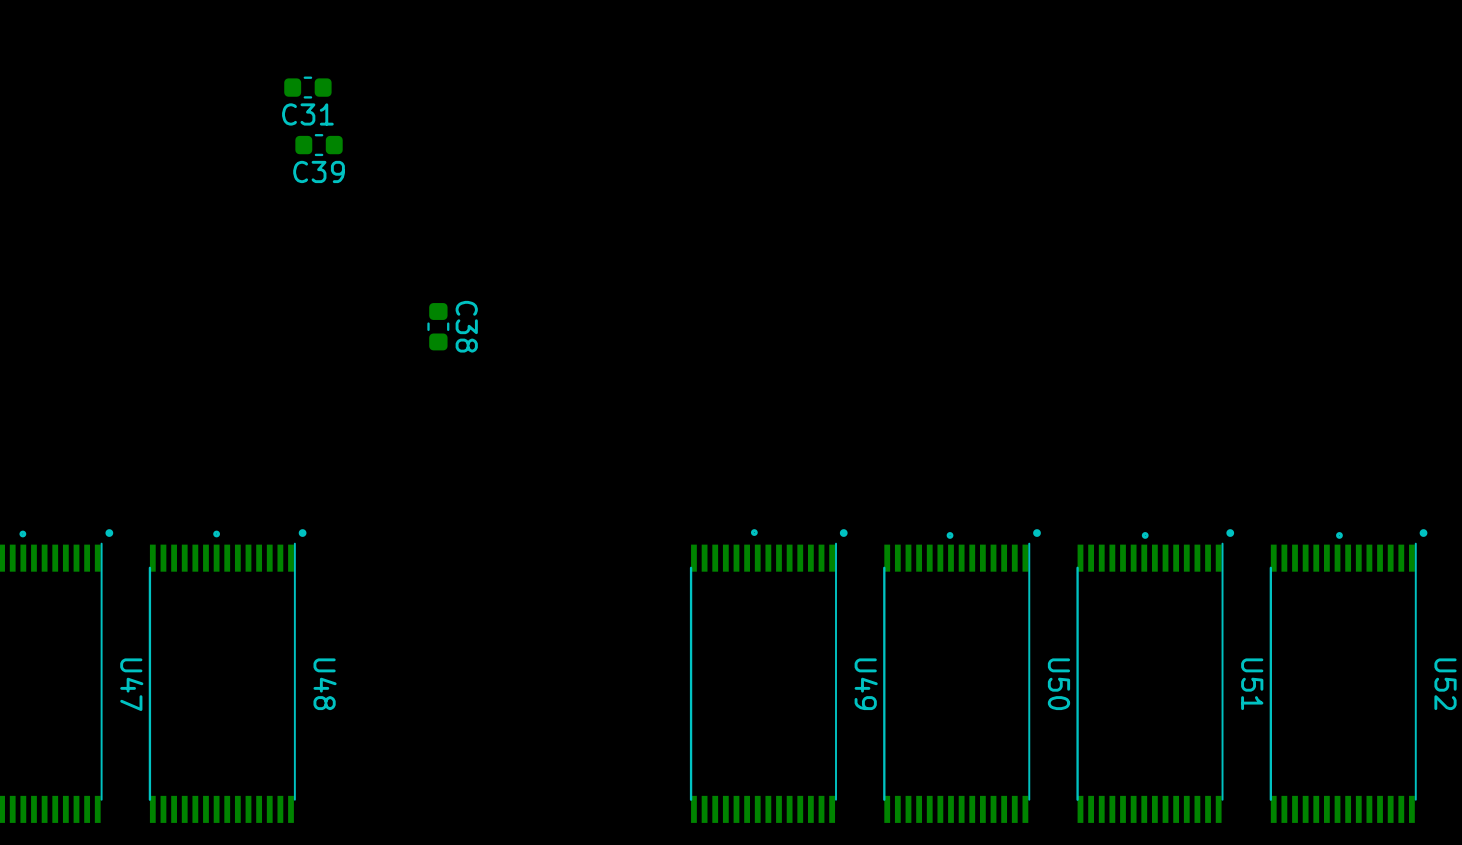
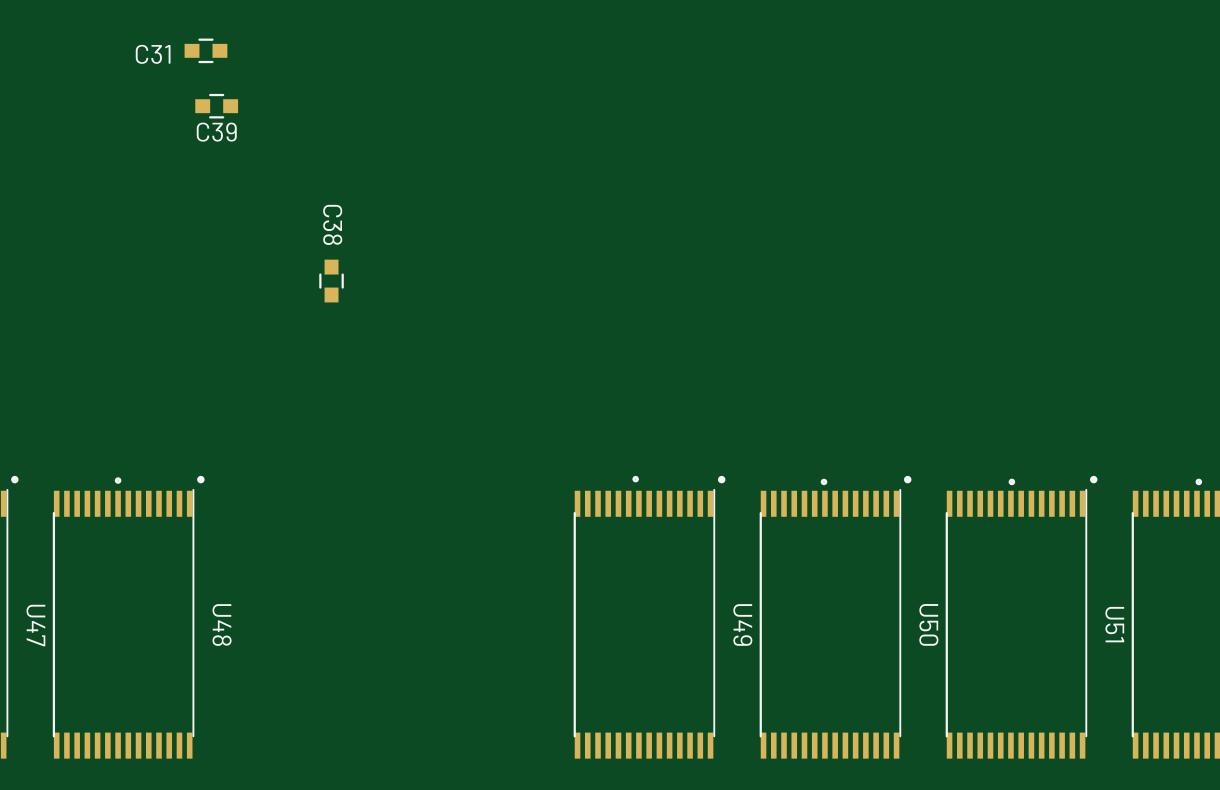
C31 footprint: [284, 76, 332, 99] -> [184, 38, 228, 64]
C31 name position: C31 (307, 114) -> C31 (153, 54)
C39 footprint: [295, 134, 343, 157] -> [195, 93, 239, 119]
C38 footprint: [427, 303, 450, 351] -> [319, 259, 344, 303]
C38 name position: C38 (466, 326) -> C38 (332, 224)

